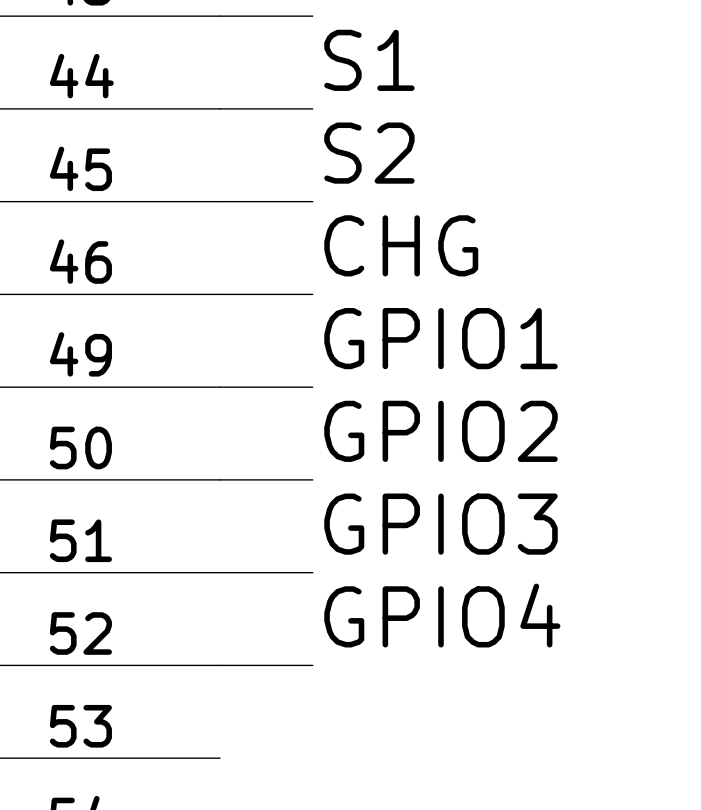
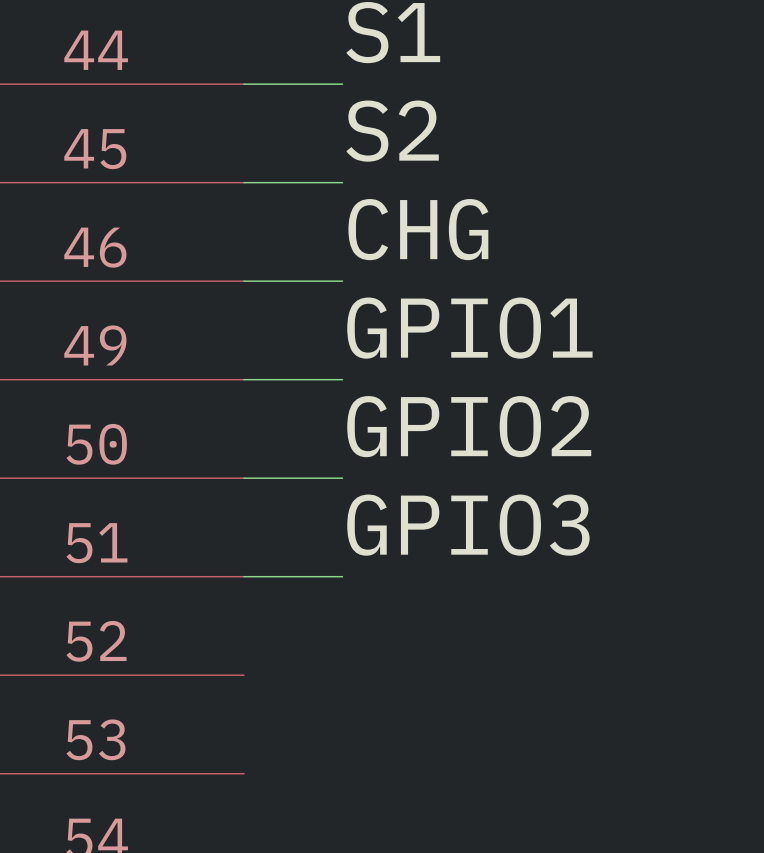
label: GPIO4 (442, 615) -> none
wire: (220, 665) (312, 665) -> none

